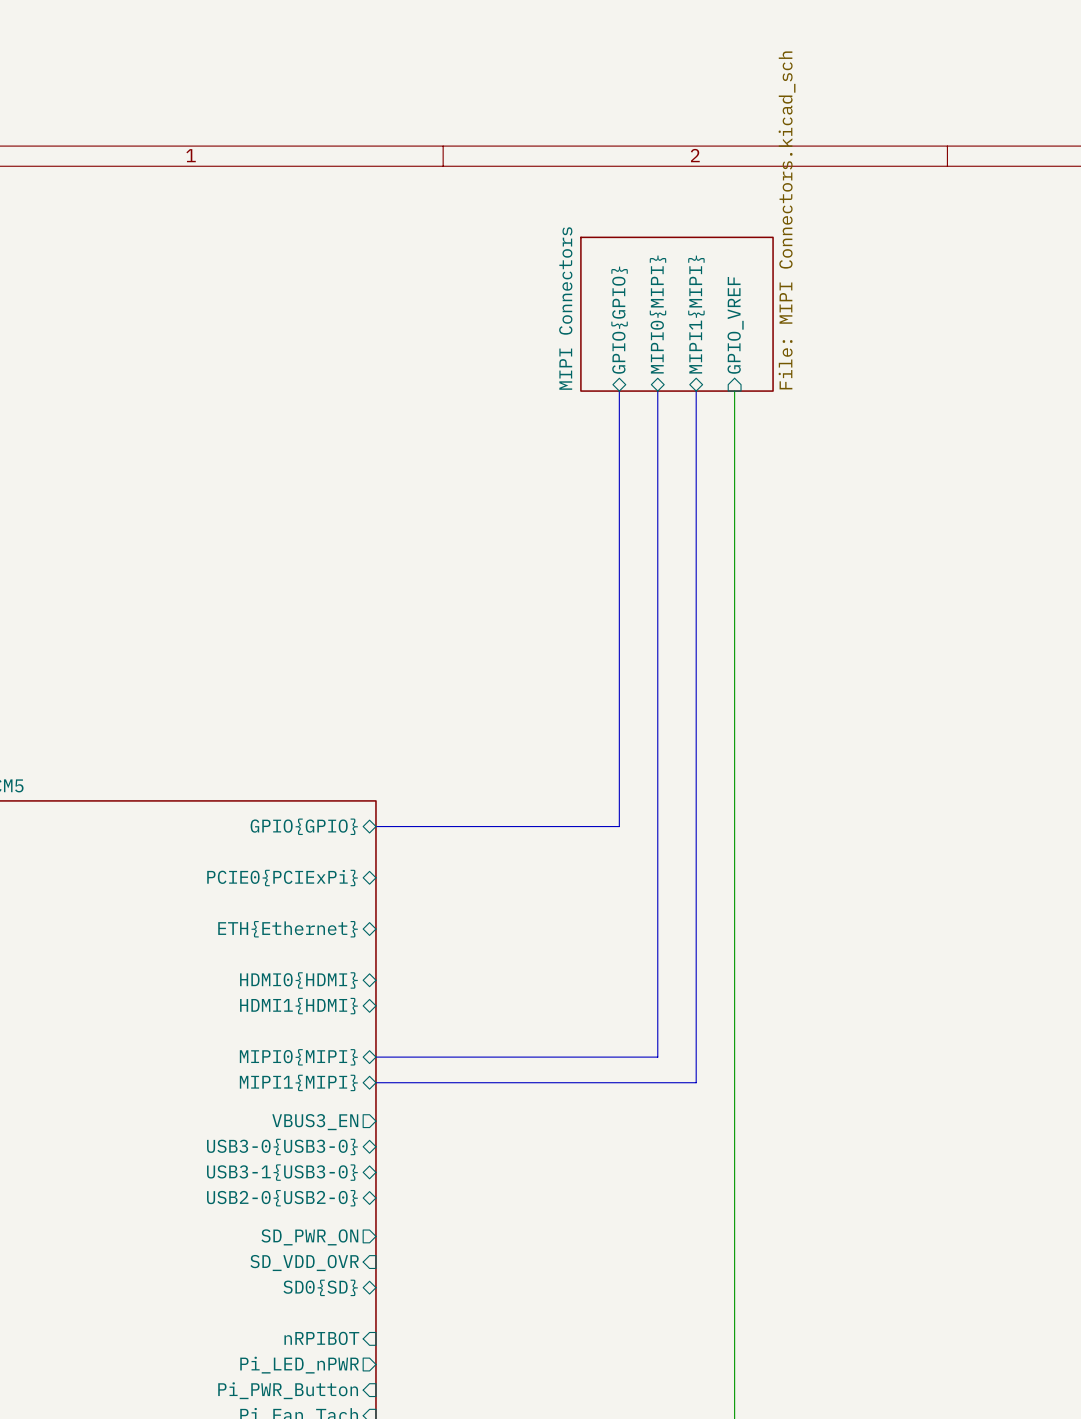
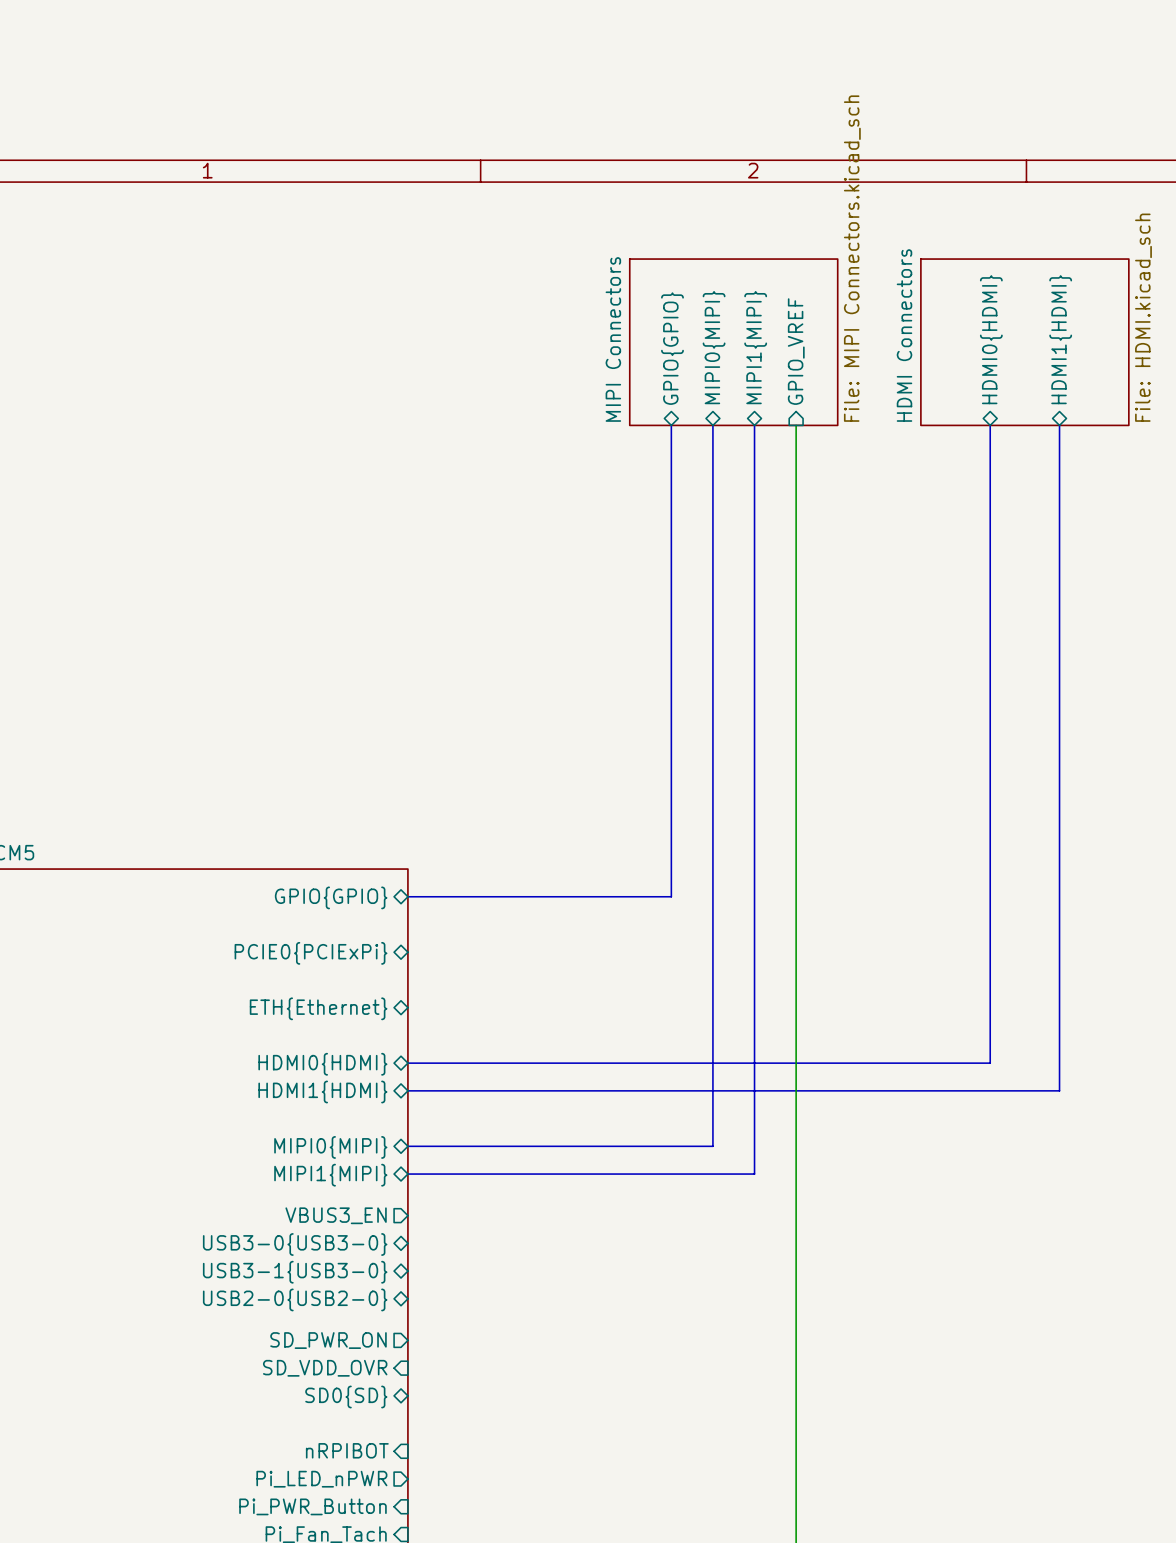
sheet pin: none -> HDMI0{HDMI} (991, 339)
sheet HDMI Connectors: none -> File: HDMI.kicad_sch (1024, 342)
sheet pin: none -> HDMI1{HDMI} (1060, 339)
bus: none -> (990, 425) (990, 1063) (407, 1063)
bus: none -> (1059, 425) (1059, 1090) (407, 1090)

